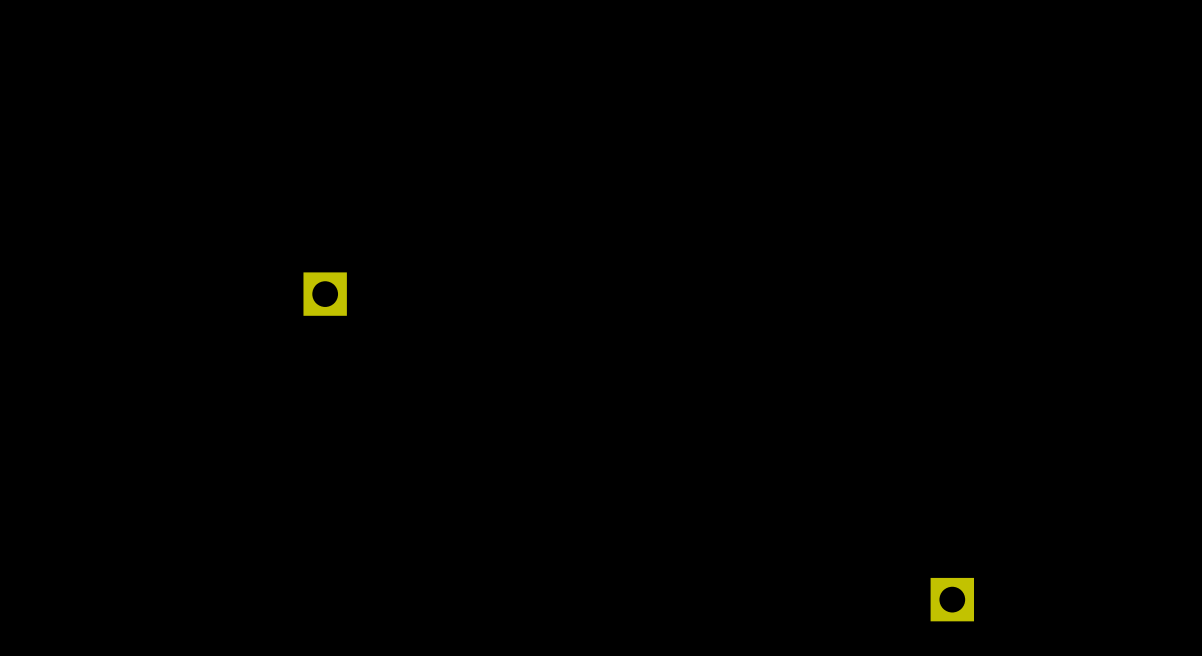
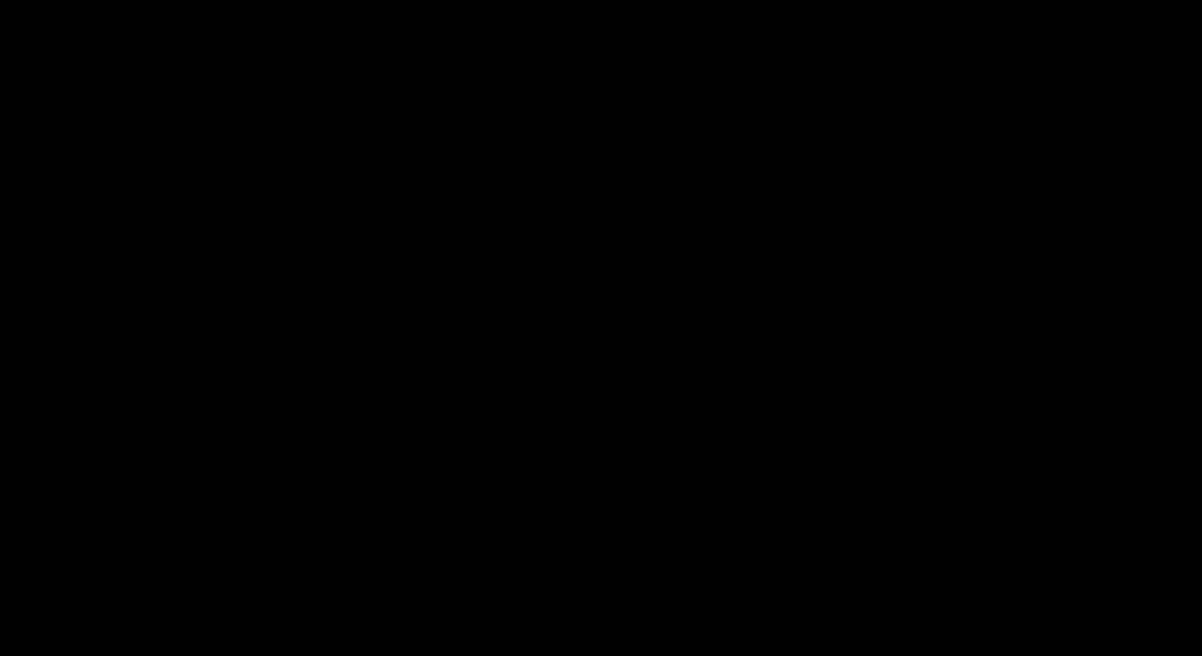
part: (325, 294) -> none
part: (952, 599) -> none

